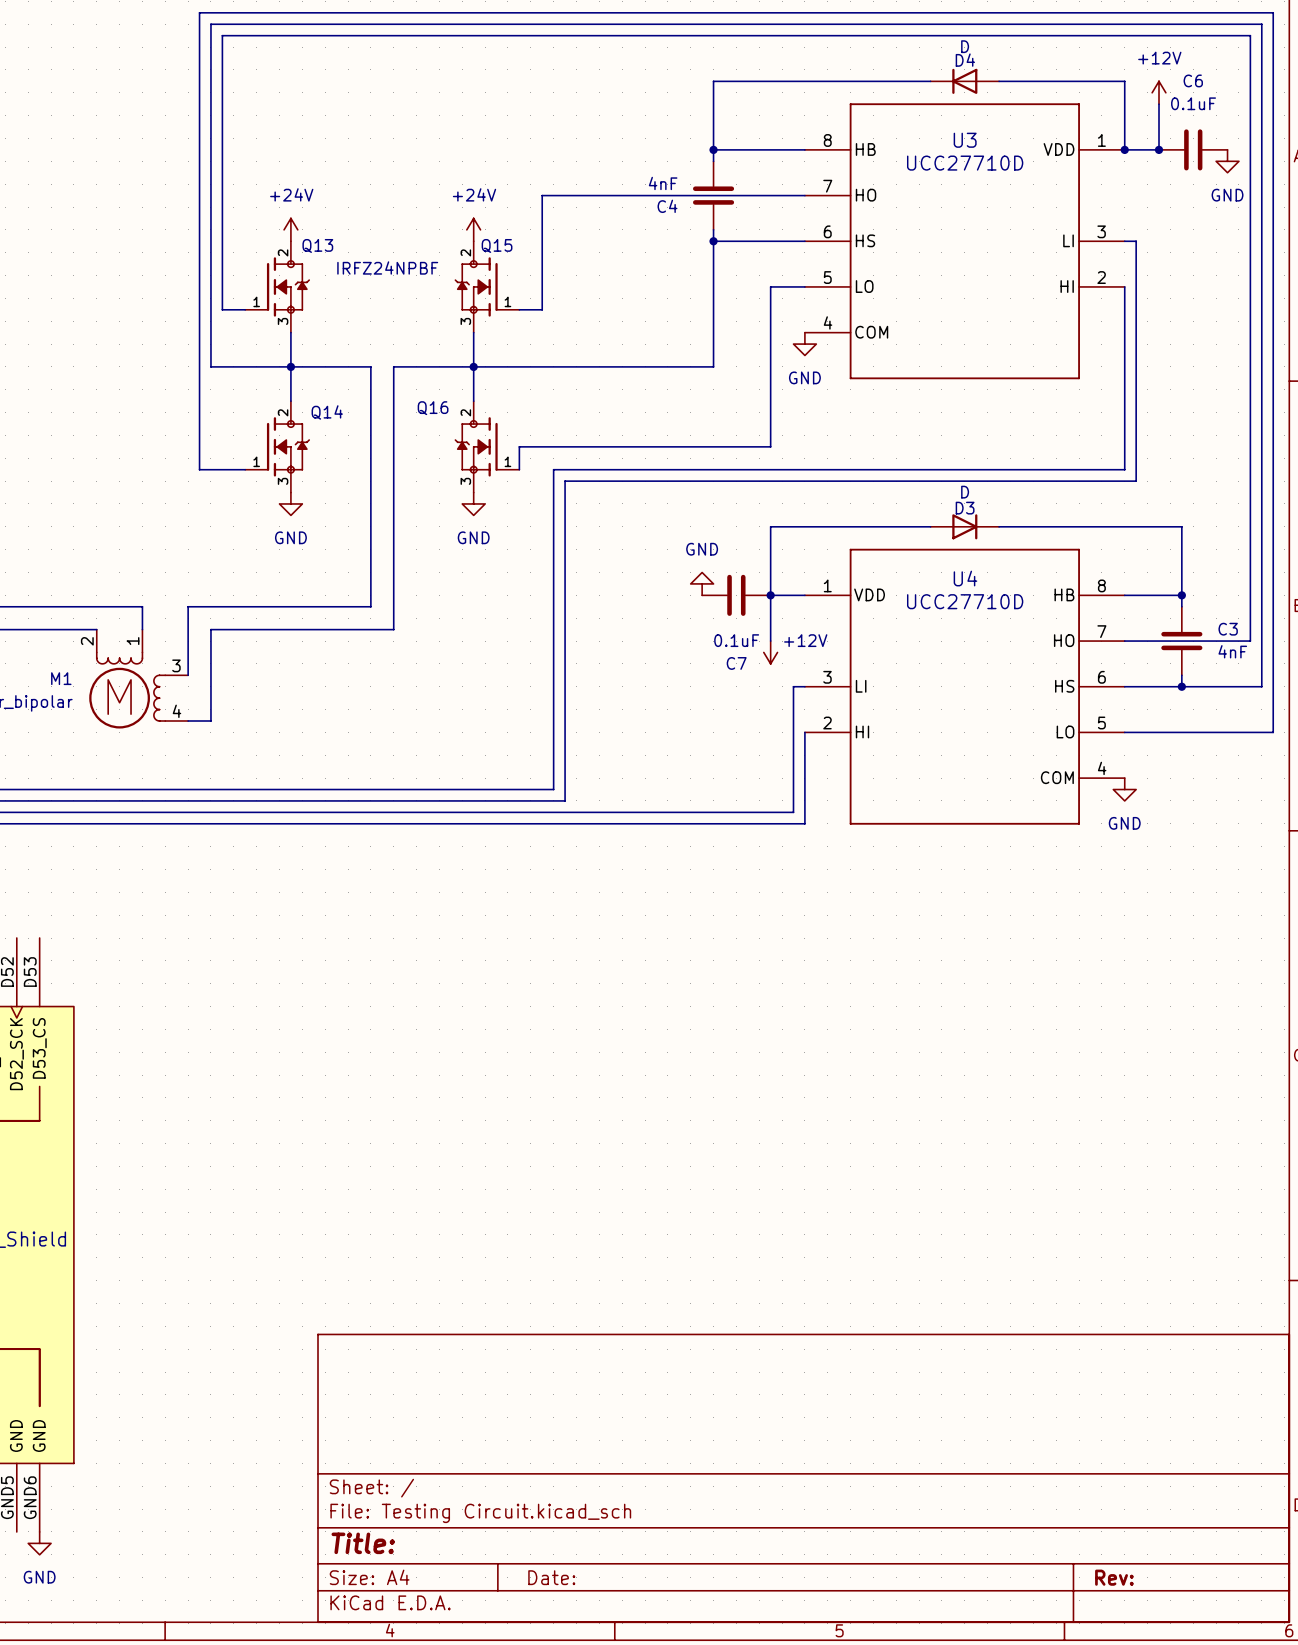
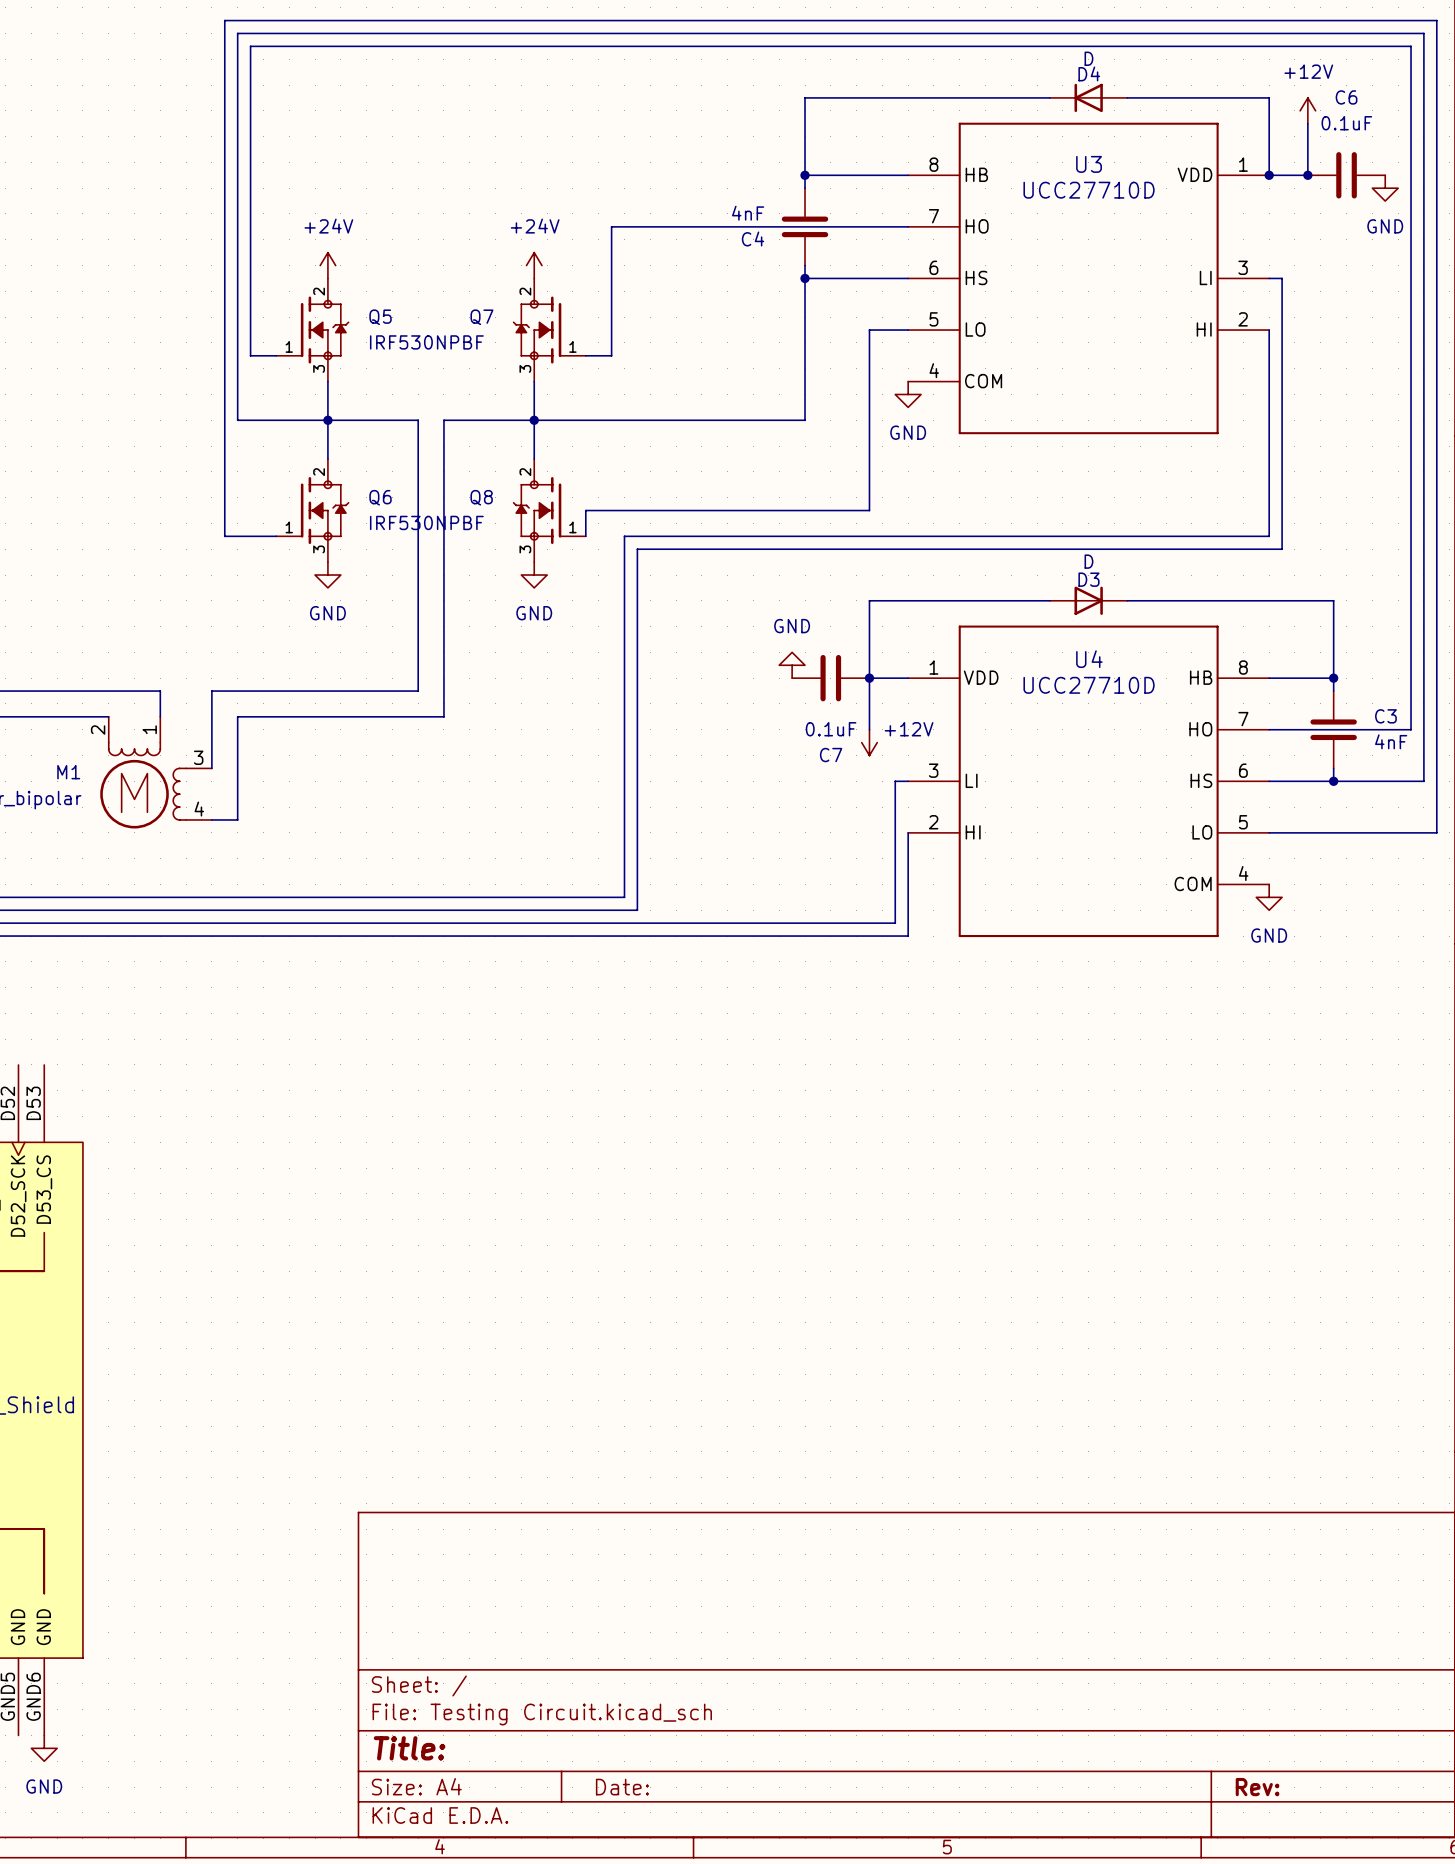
Q13 name: Q13 (317, 245) -> Q5 (380, 317)
Q15 name: Q15 (497, 245) -> Q7 (481, 317)
Q13 value: IRFZ24NPBF (387, 267) -> IRF530NPBF (426, 342)
Q16 name: Q16 (433, 408) -> Q8 (481, 497)
Q14 name: Q14 (327, 412) -> Q6 (380, 497)
Q14 value: none -> IRF530NPBF (426, 522)

